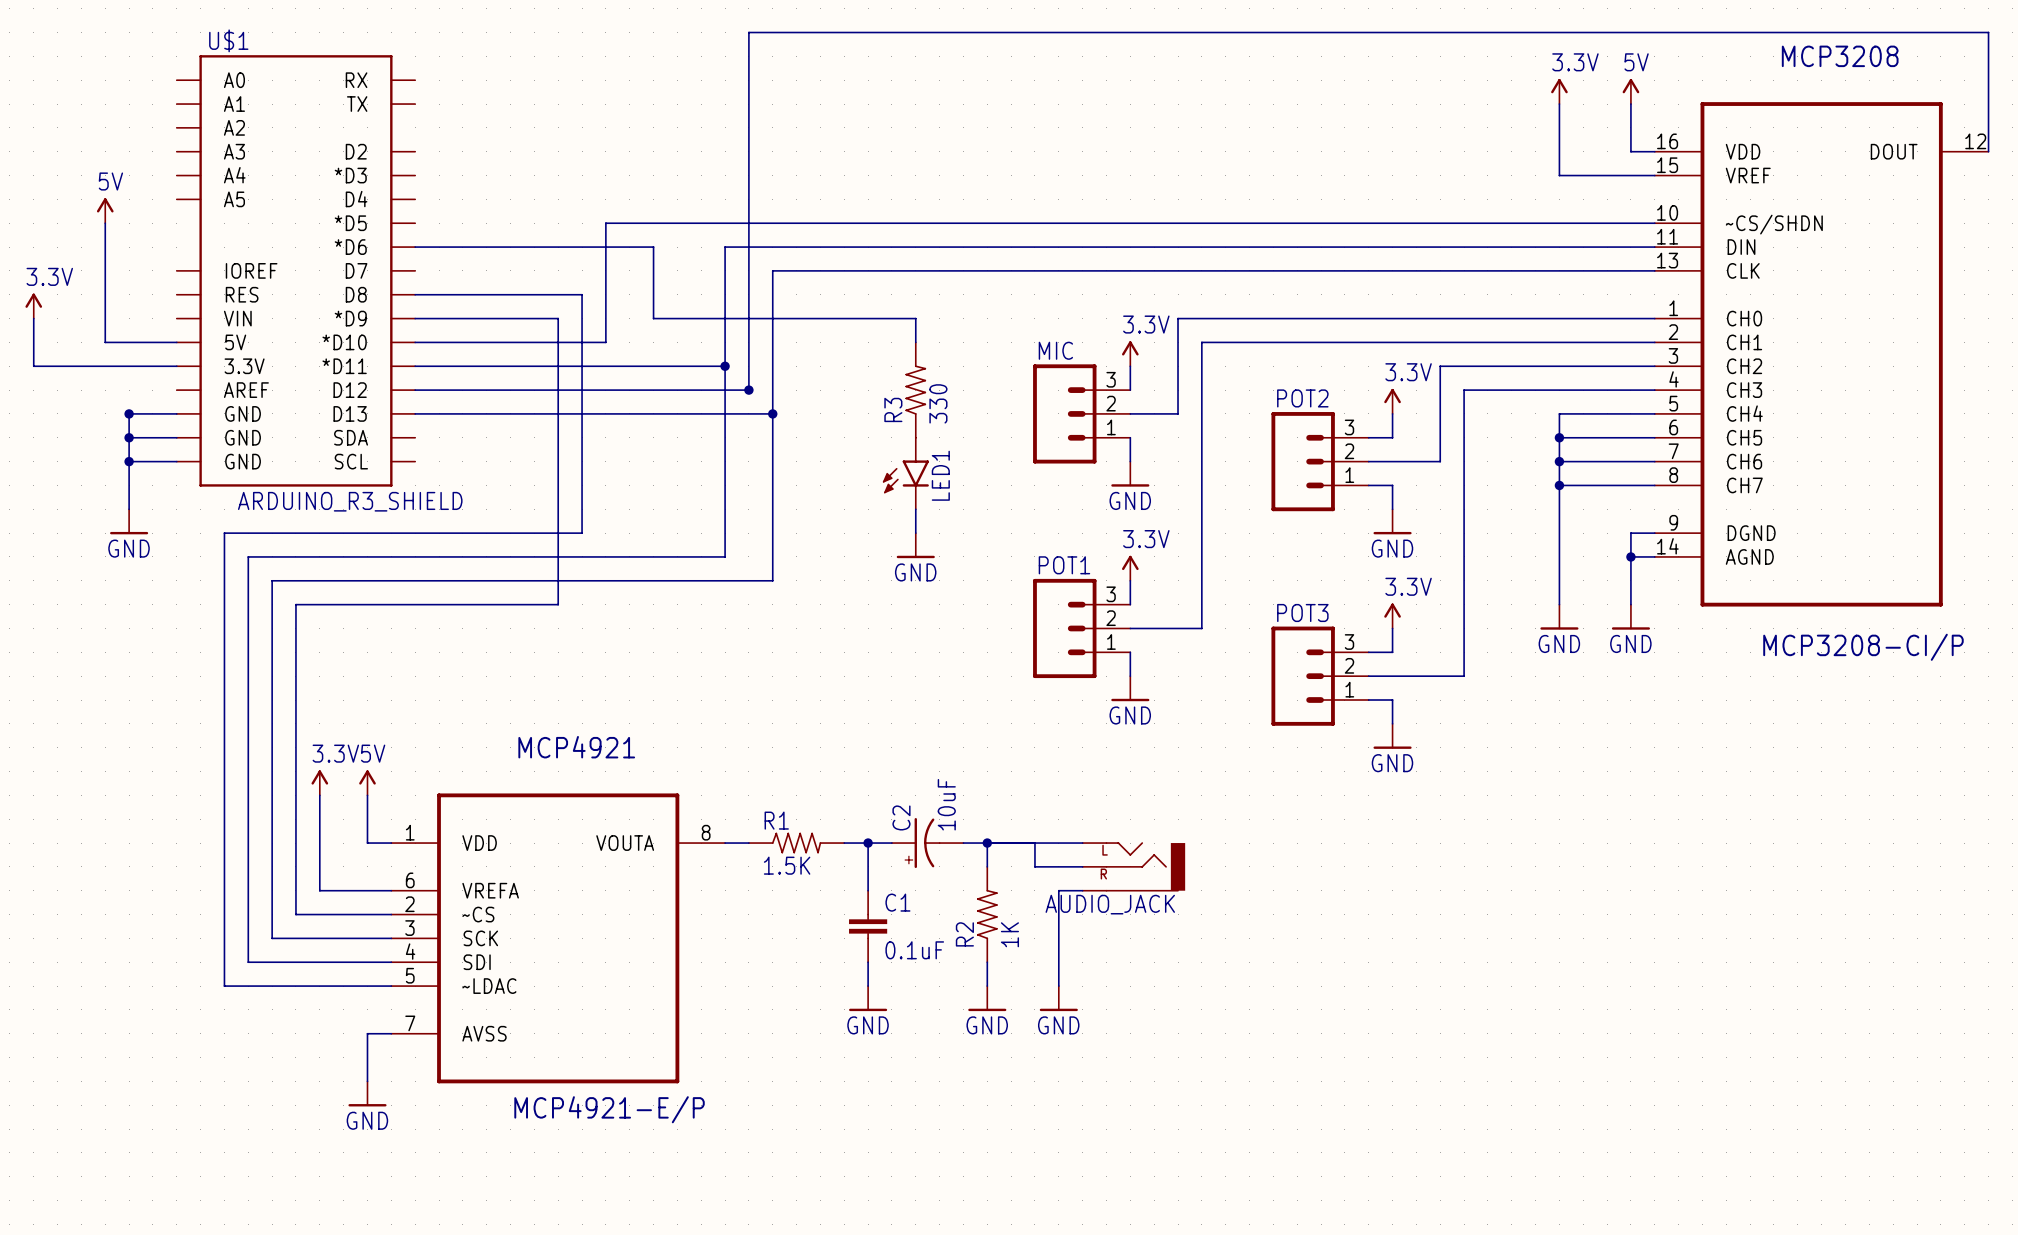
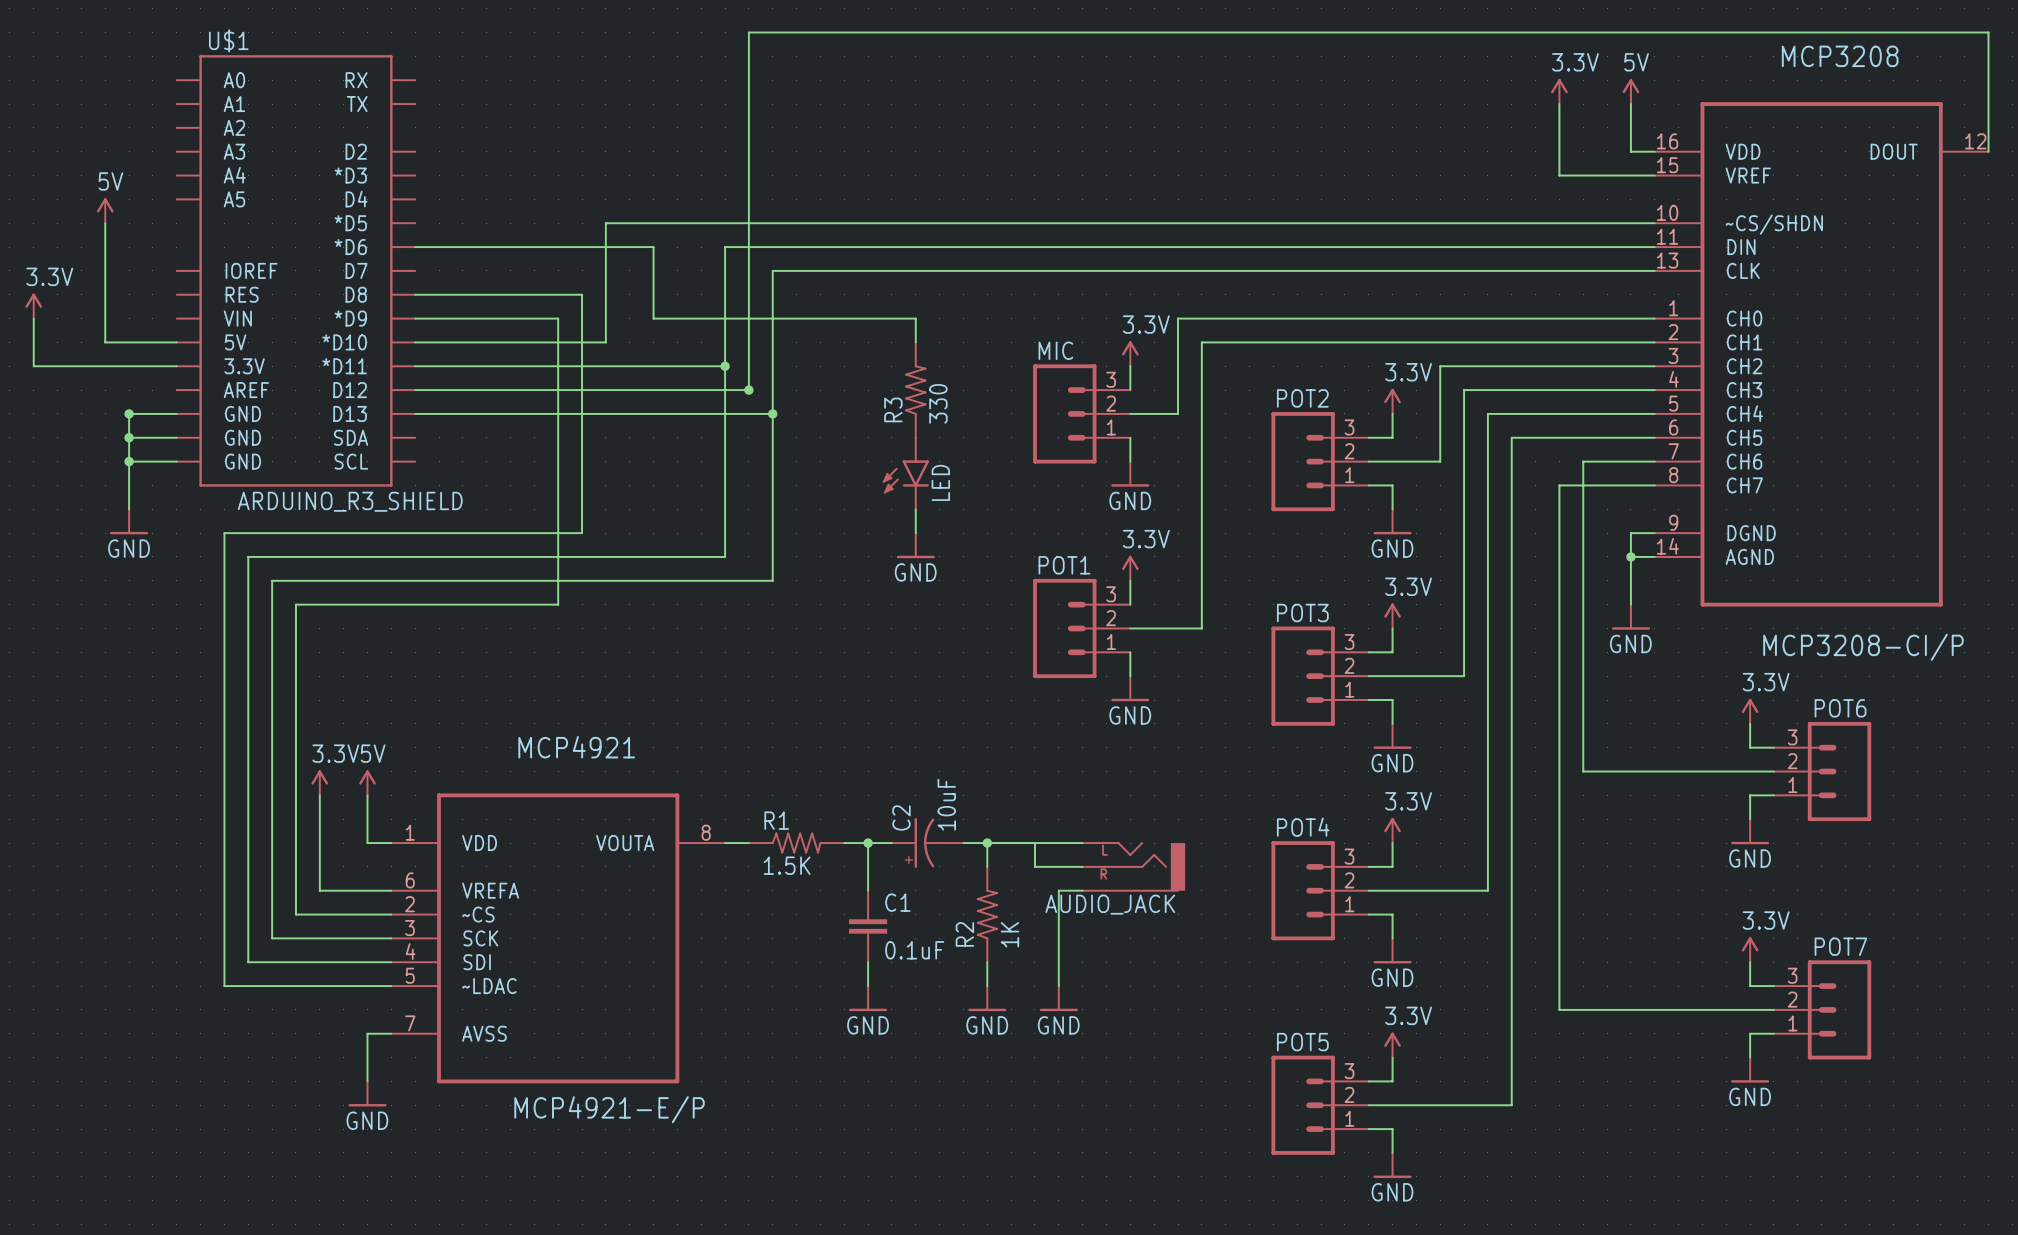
wire: (1559, 413) (1559, 485) -> (1559, 413) (1487, 413) (1487, 890) (1368, 890)
wire: none -> (1559, 437) (1511, 437) (1511, 1105) (1368, 1105)
junction: (1559, 437) -> none
wire: (1559, 461) (1583, 461) -> (1773, 771) (1583, 771) (1583, 461)
junction: (1559, 461) -> none
LED1 name: LED1 (940, 475) -> LED (940, 482)
junction: (1559, 485) -> none
wire: none -> (1559, 604) (1559, 1009) (1773, 1009)
power symbol: GND (1559, 617) -> none
power symbol: none -> 3.3V (1750, 711)
wire: none -> (1750, 723) (1750, 747) (1773, 747)
POT6: none -> (1822, 771)
wire: none -> (1773, 795) (1750, 795) (1750, 819)
power symbol: none -> 3.3V (1392, 830)
power symbol: none -> GND (1750, 831)
wire: none -> (1392, 843) (1392, 866) (1368, 866)
POT4: none -> (1320, 890)
wire: none -> (1368, 914) (1392, 914) (1392, 938)
power symbol: none -> 3.3V (1750, 949)
power symbol: none -> GND (1392, 950)
wire: none -> (1750, 962) (1750, 986) (1773, 986)
POT7: none -> (1822, 1009)
wire: none -> (1773, 1033) (1750, 1033) (1750, 1057)
power symbol: none -> 3.3V (1392, 1045)
wire: none -> (1392, 1057) (1392, 1081) (1368, 1081)
power symbol: none -> GND (1750, 1070)
POT5: none -> (1320, 1105)
wire: none -> (1368, 1129) (1392, 1129) (1392, 1152)
power symbol: none -> GND (1392, 1165)

